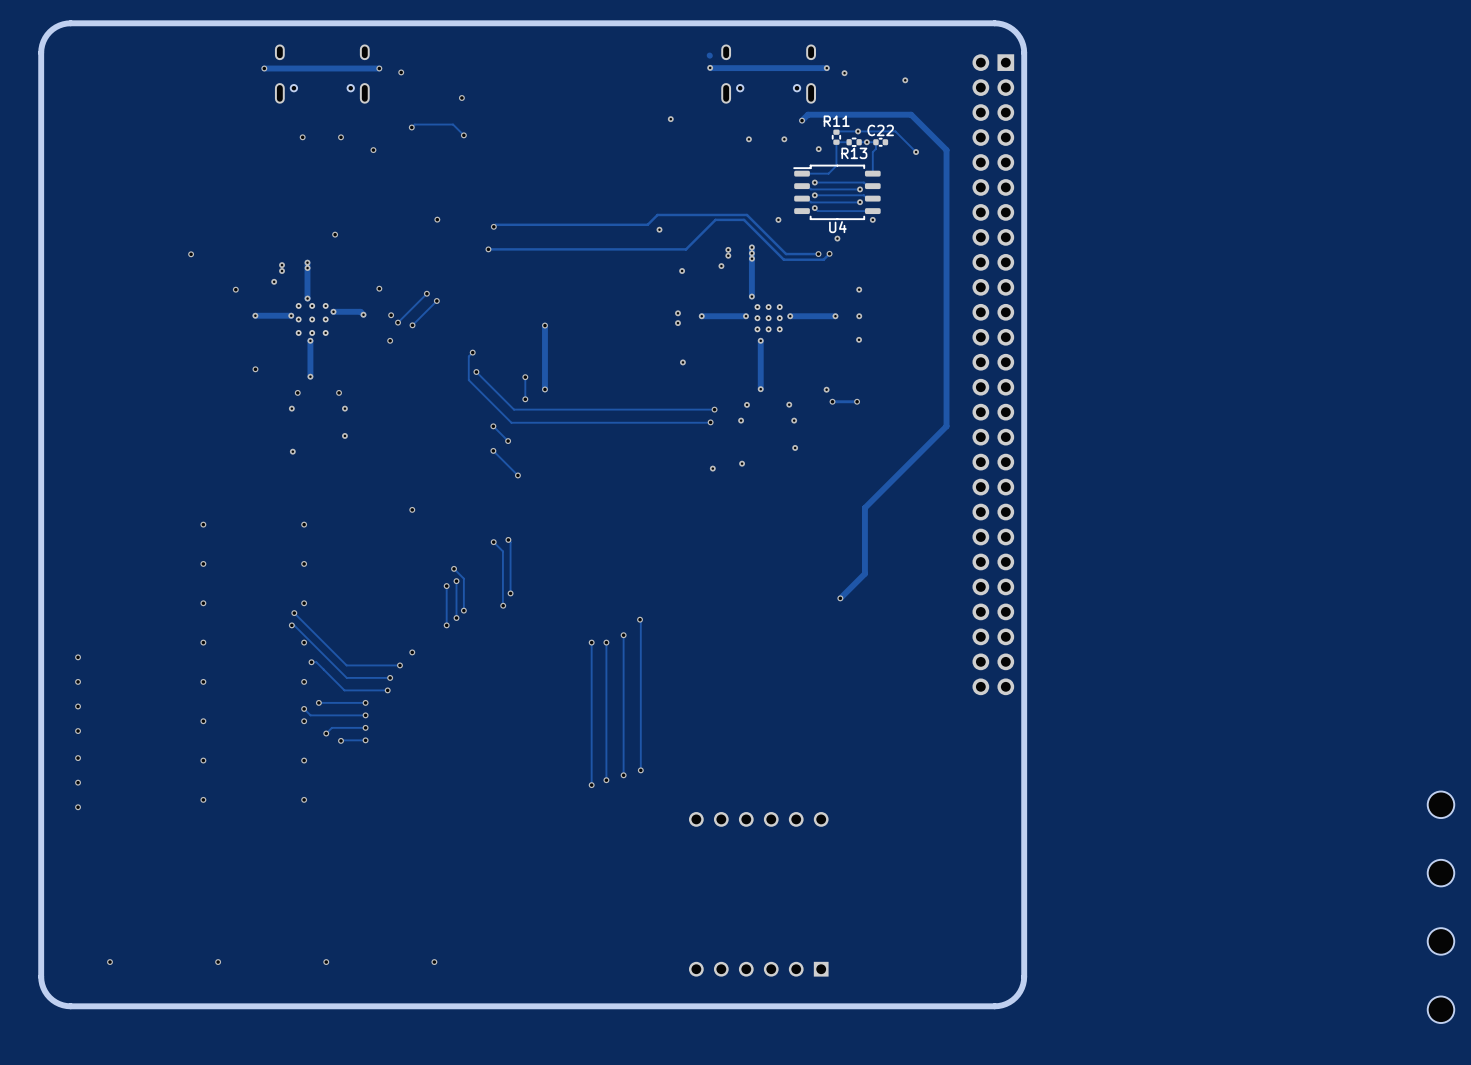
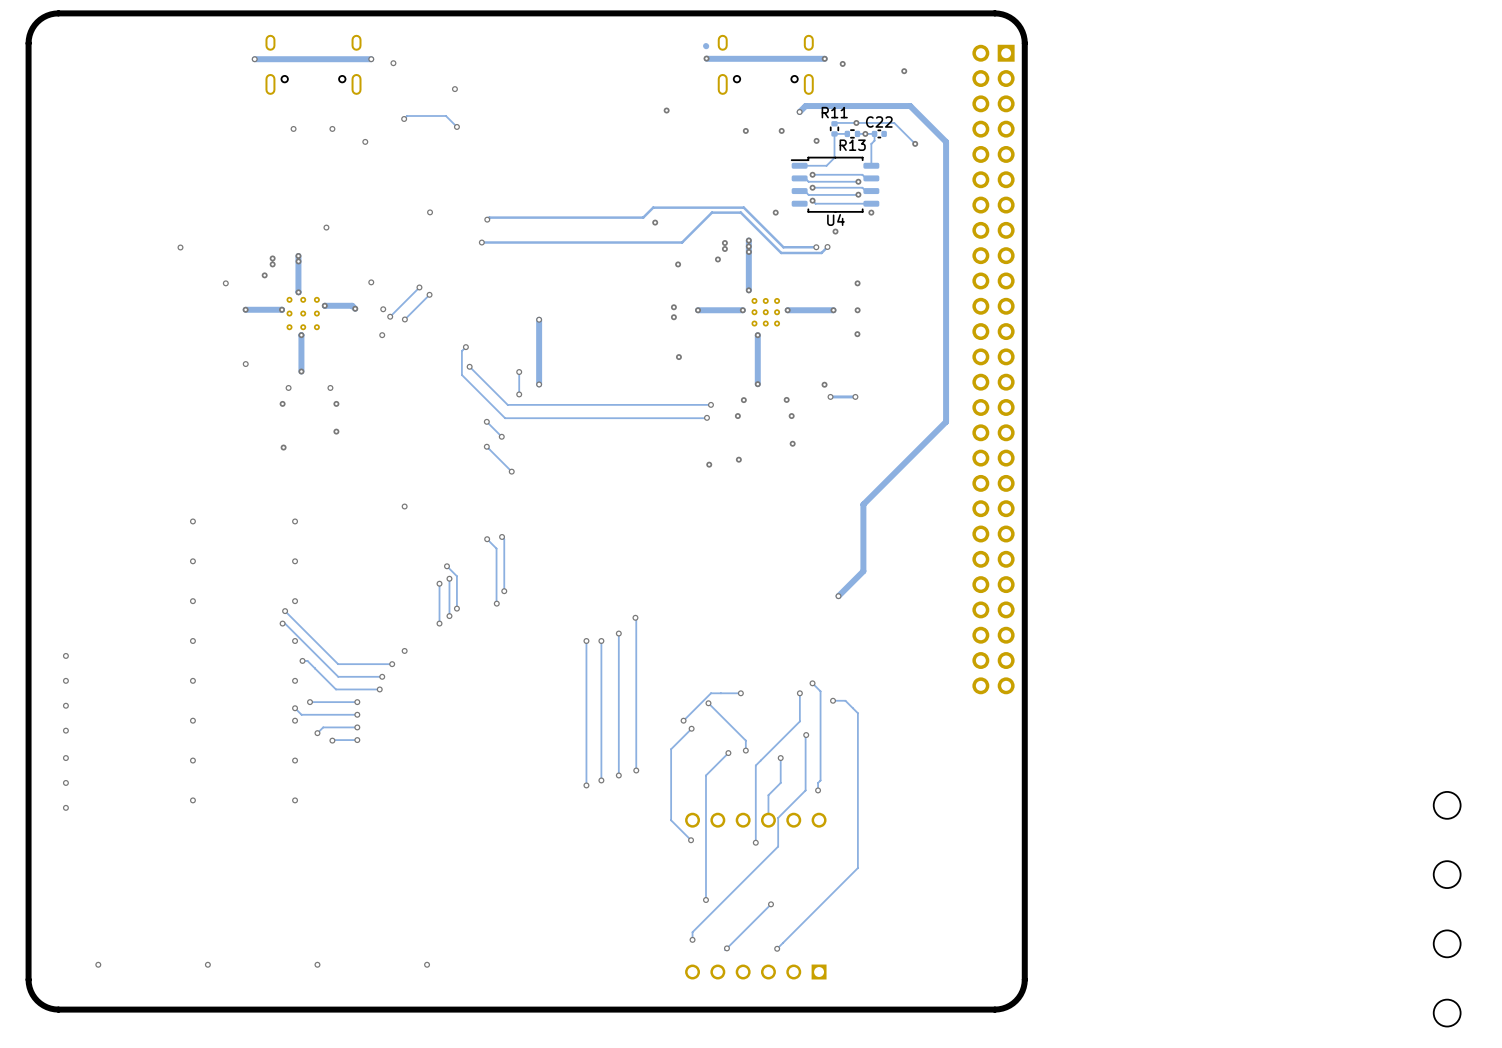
track: none -> (812, 683) (820, 691) (820, 780) (818, 782) (818, 790)
via: none -> (812, 683)
track: none -> (740, 693) (710, 693) (683, 720)
via: none -> (740, 693)
track: none -> (799, 693) (799, 721) (755, 765) (755, 842)
via: none -> (799, 693)
track: none -> (833, 700) (845, 700) (857, 713) (857, 868) (775, 950)
via: none -> (833, 700)
track: none -> (708, 703) (745, 740) (745, 750)
via: none -> (708, 703)
via: none -> (683, 720)
track: none -> (691, 728) (671, 749) (671, 820) (691, 840)
via: none -> (691, 728)
track: none -> (806, 735) (805, 790) (778, 817) (778, 846) (692, 932) (692, 939)
via: none -> (806, 735)
via: none -> (745, 750)
track: none -> (728, 753) (705, 775) (705, 900)
via: none -> (728, 753)
track: none -> (780, 758) (780, 782) (768, 795) (768, 820)
via: none -> (780, 758)
via: none -> (818, 790)
via: none -> (691, 840)
via: none -> (755, 842)
via: none -> (705, 900)
track: none -> (771, 904) (725, 950)
via: none -> (771, 904)
via: none -> (692, 939)
via: none -> (726, 948)
via: none -> (777, 948)

